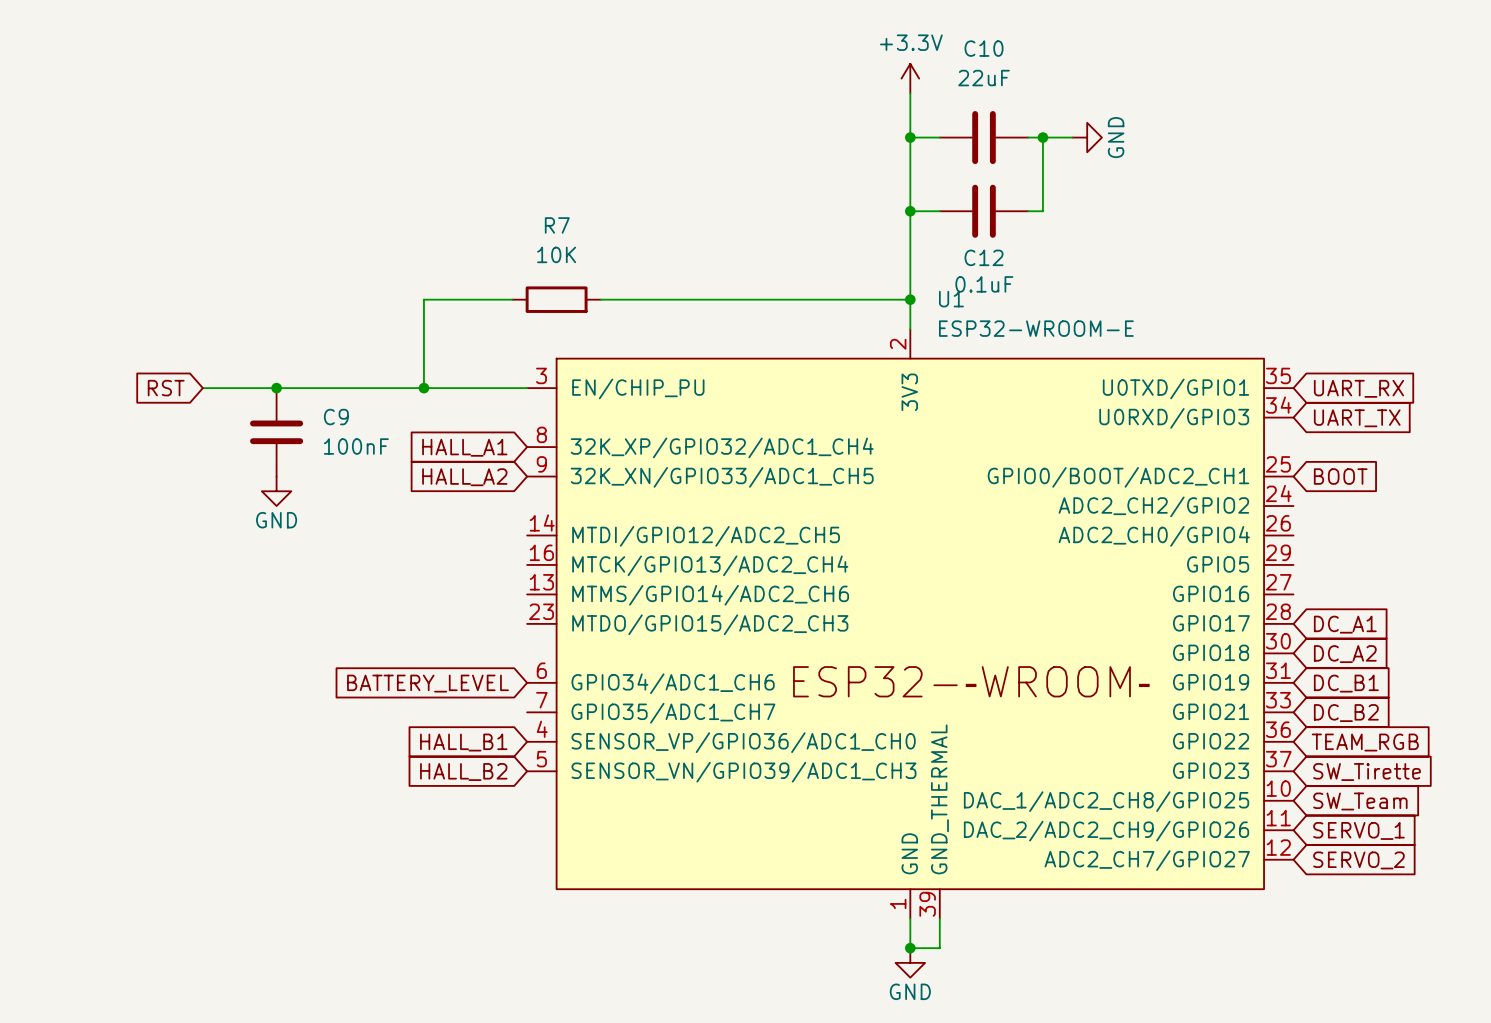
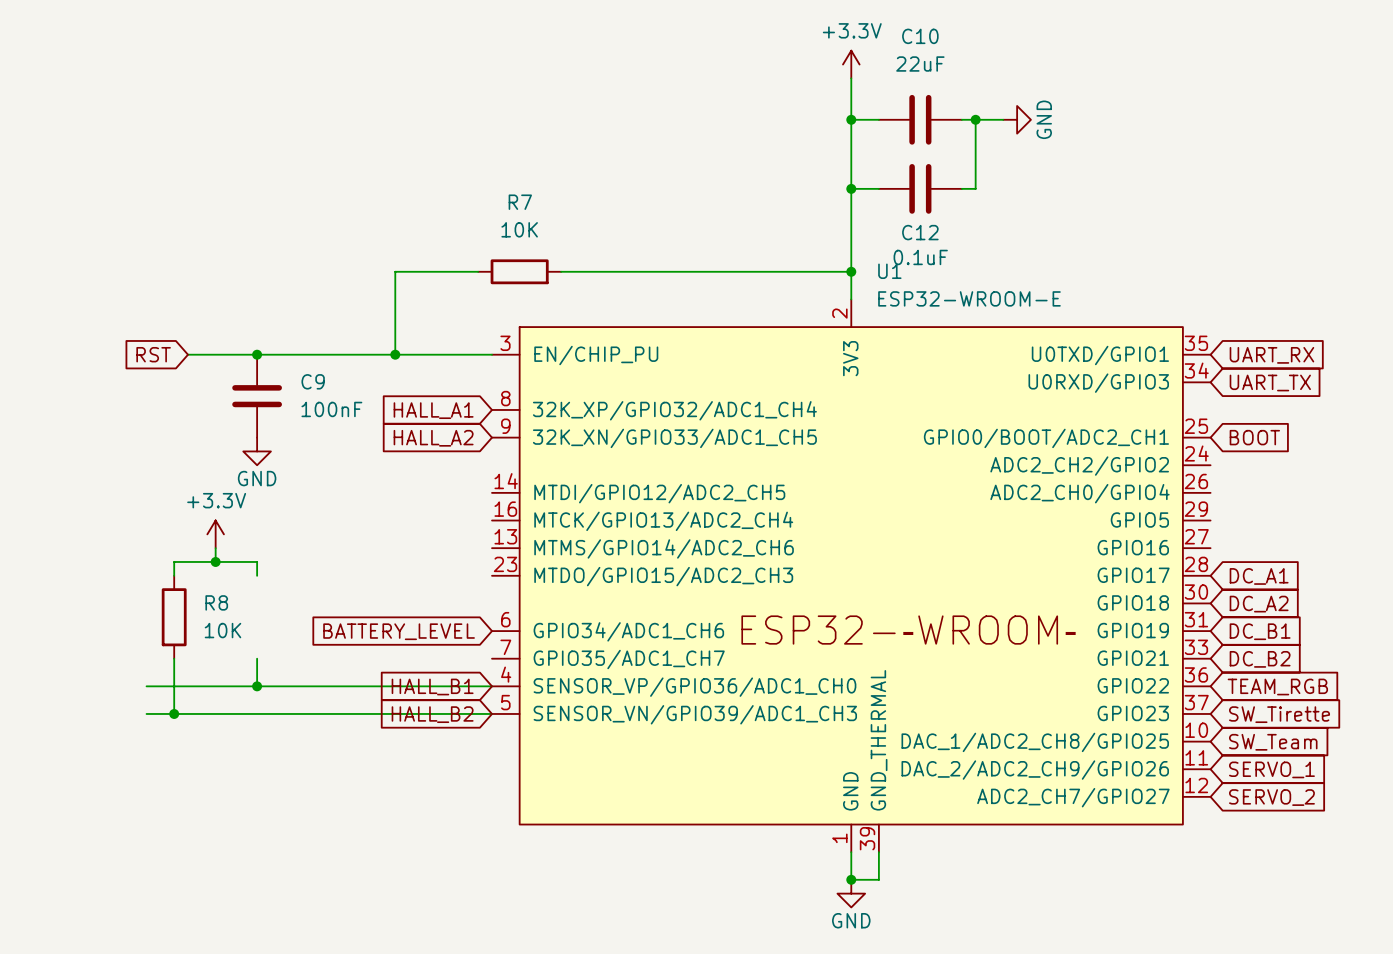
power symbol: none -> +3.3V (215, 534)
wire: none -> (215, 548) (215, 561)
junction: none -> (215, 561)
wire: none -> (174, 575) (174, 561) (257, 561) (257, 575)
R8: none -> 10K (174, 617)
wire: none -> (174, 658) (174, 713)
wire: none -> (257, 658) (257, 686)
wire: none -> (146, 686) (492, 686)
junction: none -> (257, 686)
wire: none -> (146, 713) (492, 713)
junction: none -> (174, 713)

